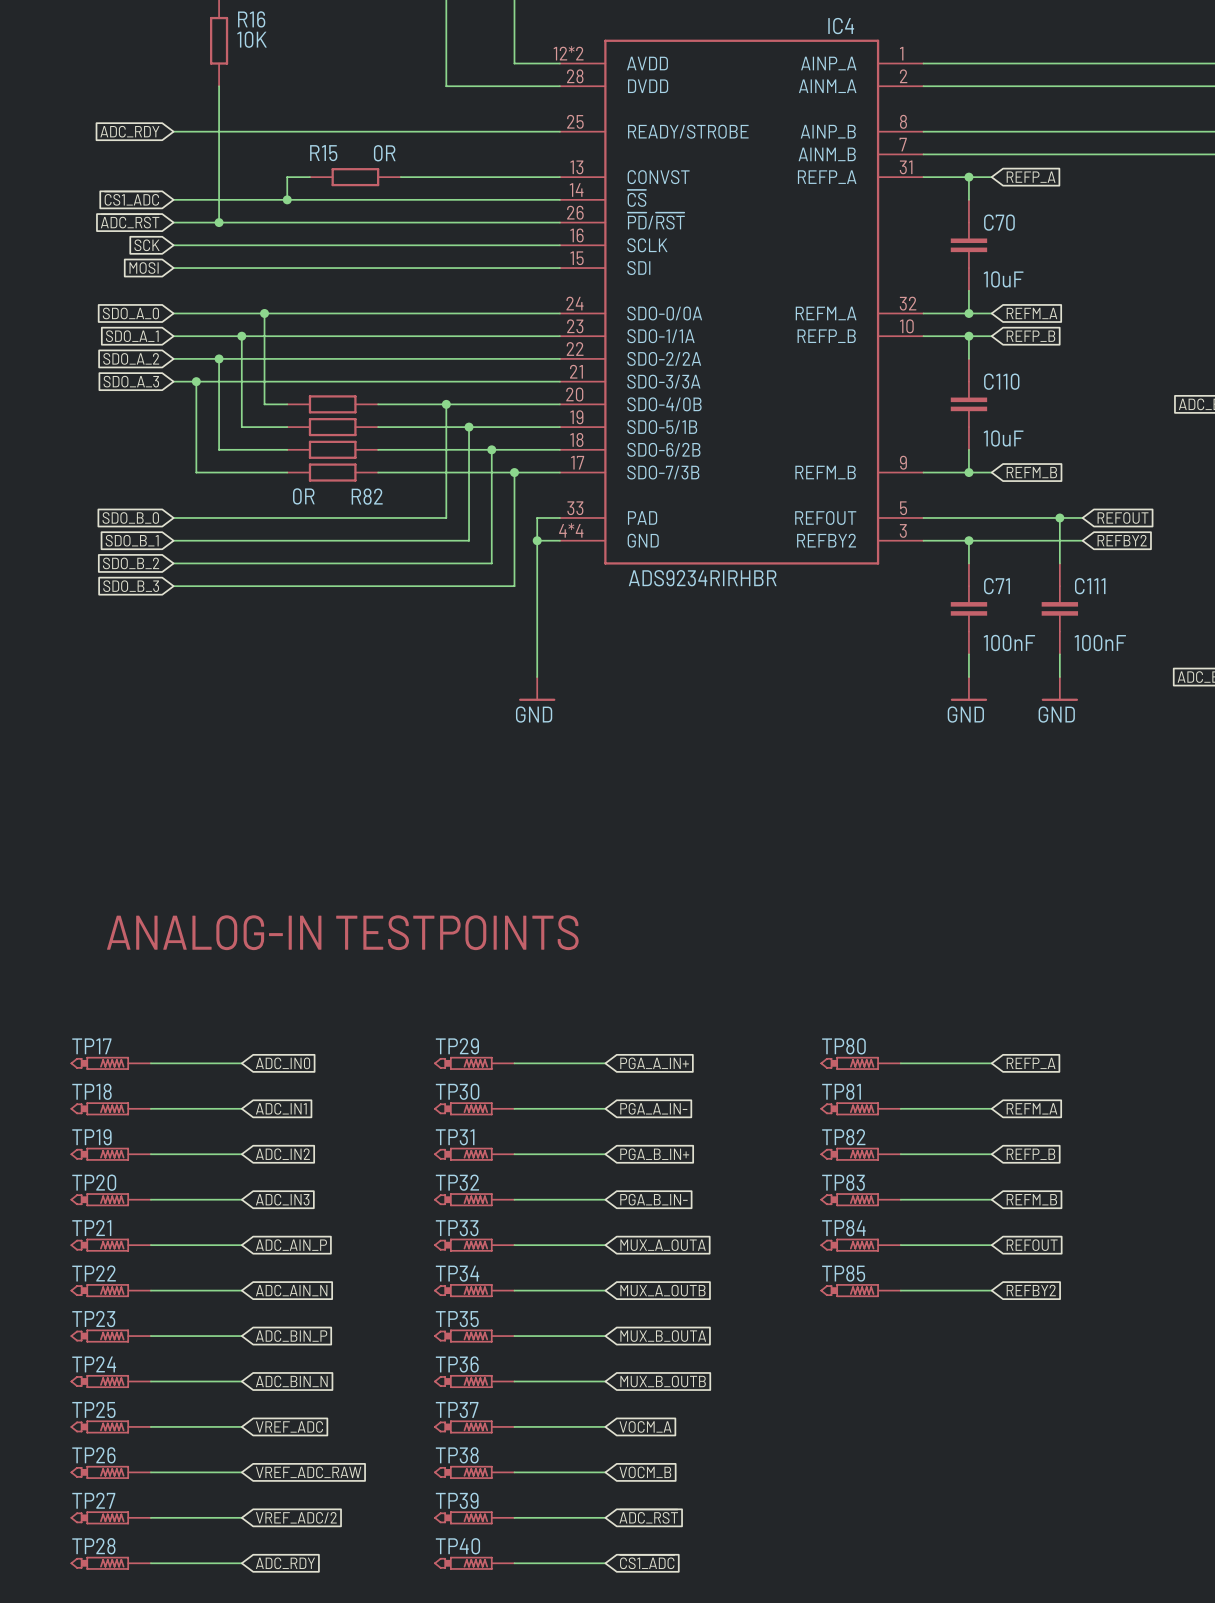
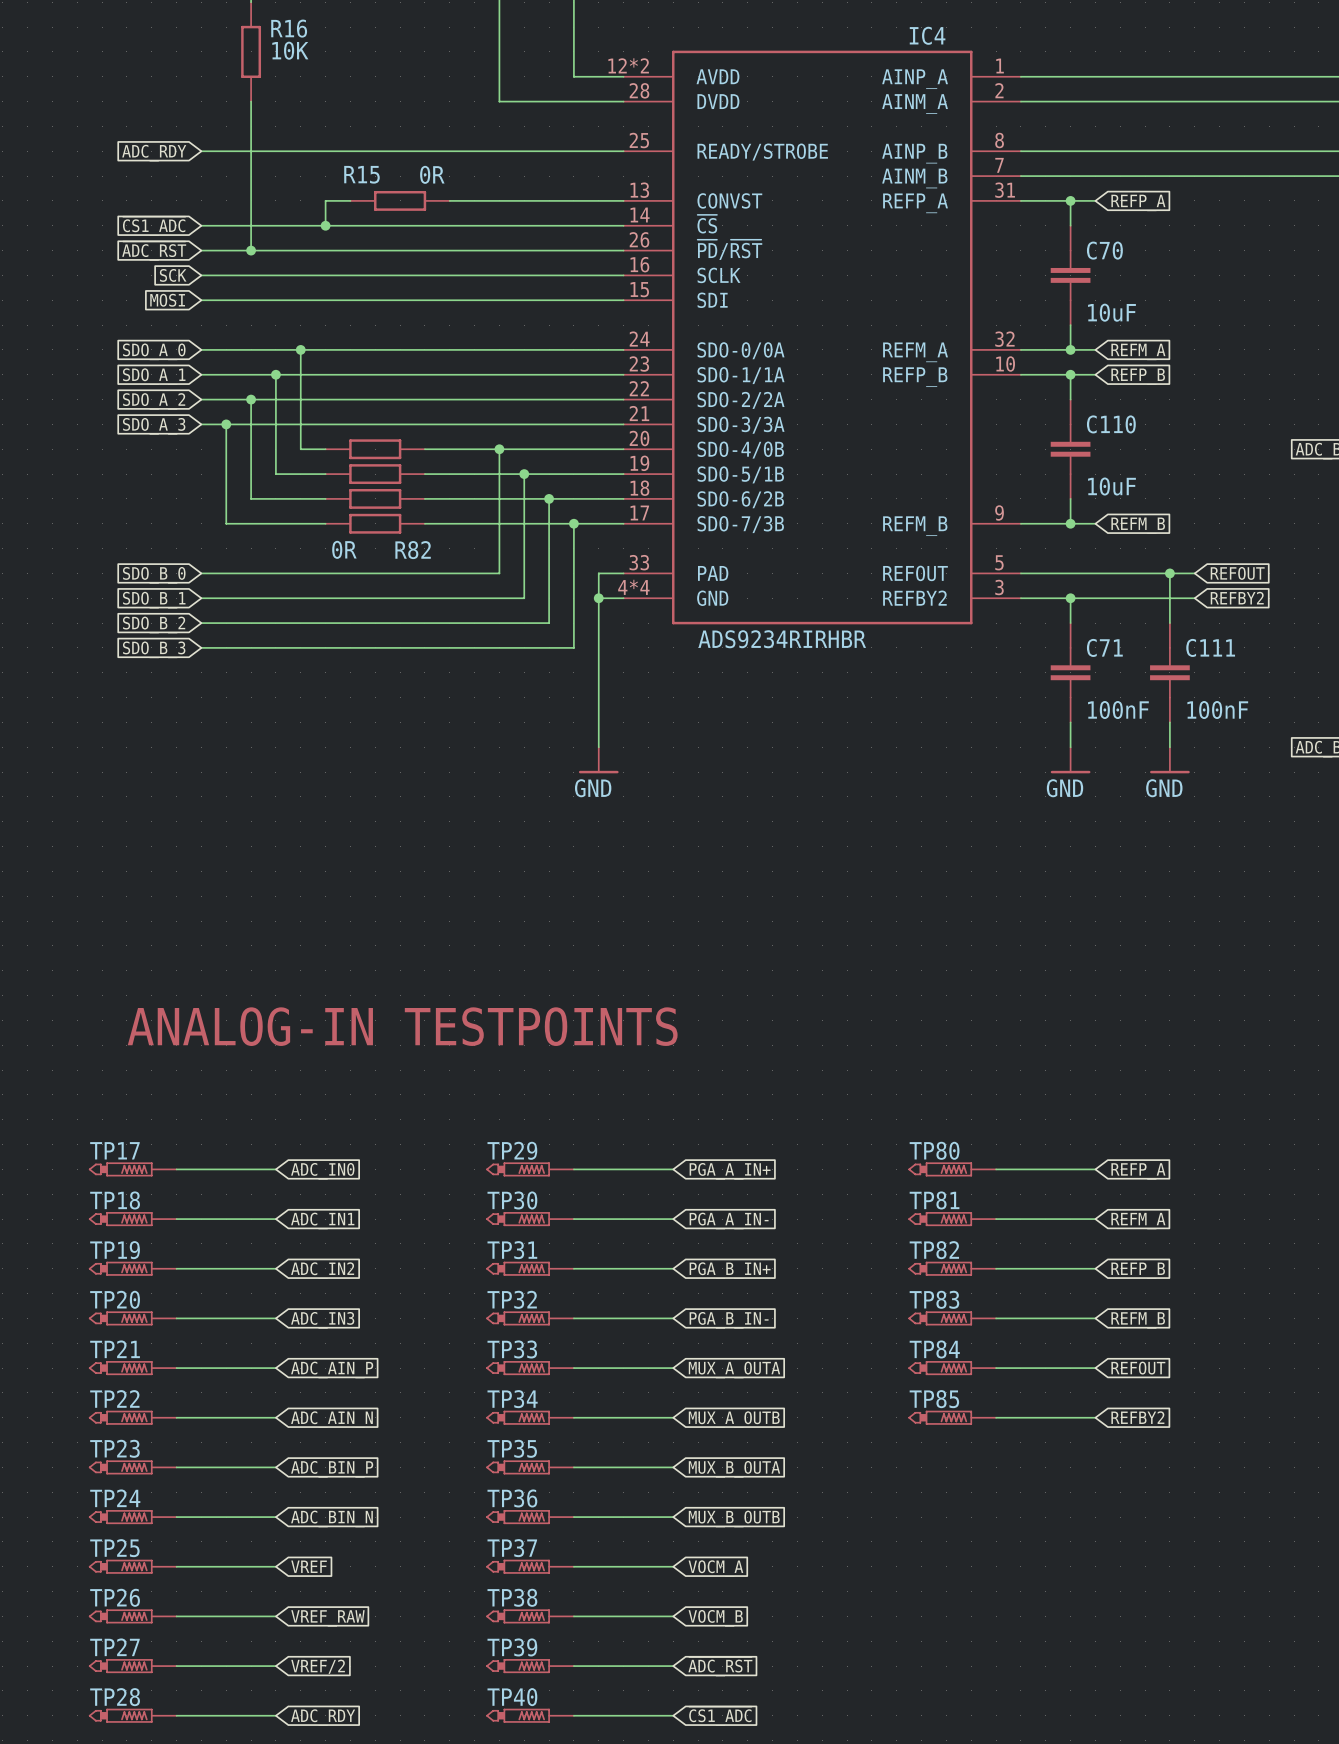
global label: VREF_ADC (289, 1426) -> VREF (309, 1566)
global label: VREF_ADC_RAW (308, 1472) -> VREF_RAW (327, 1618)
global label: VREF_ADC/2 (296, 1517) -> VREF/2 (318, 1666)

